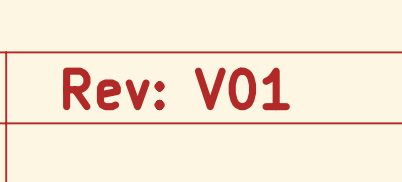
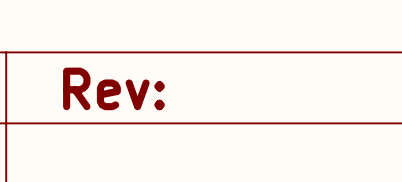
title block: Rev: V01 (176, 88) -> Rev: (113, 88)

